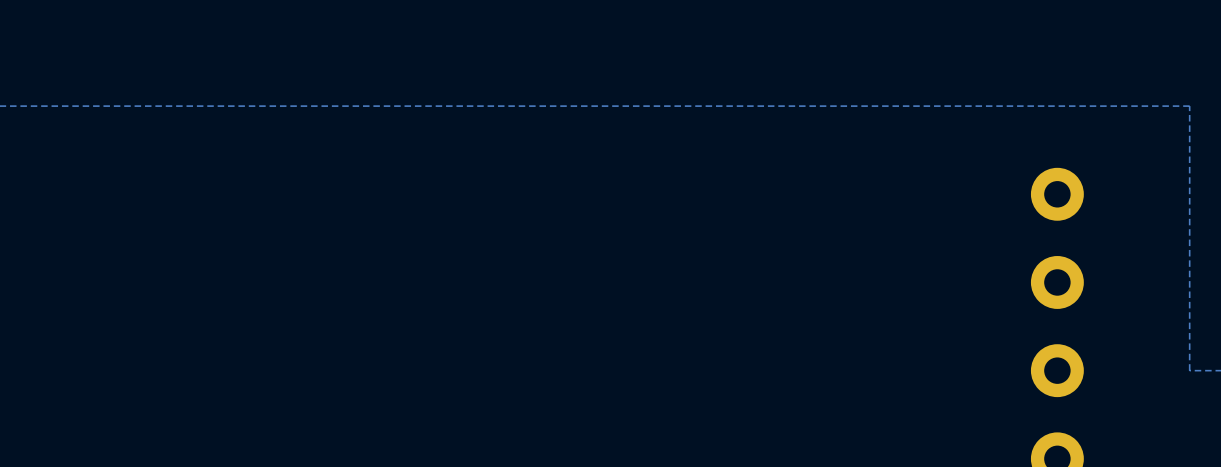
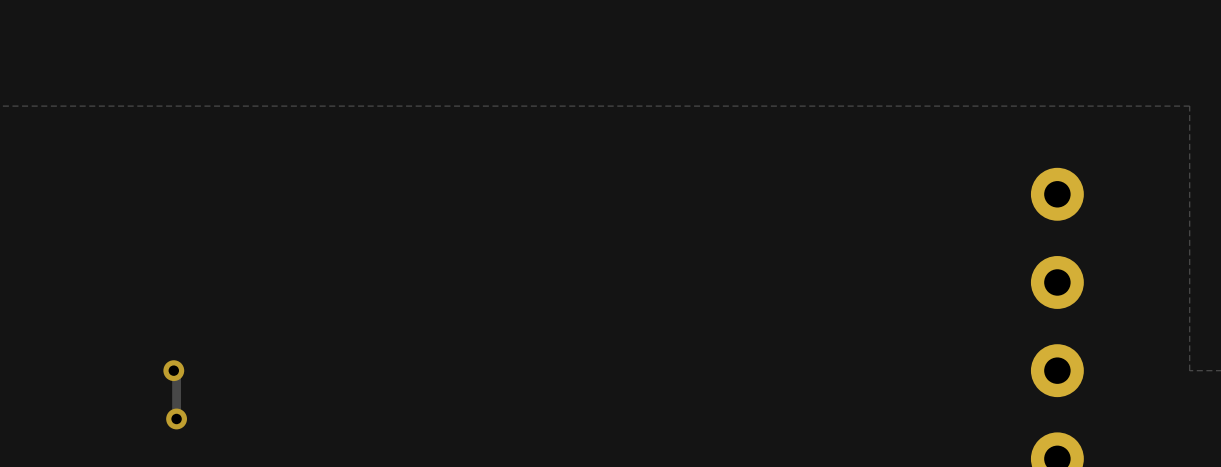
track: none -> (173, 370) (176, 373) (176, 418)
via: none -> (173, 370)
via: none -> (176, 418)

